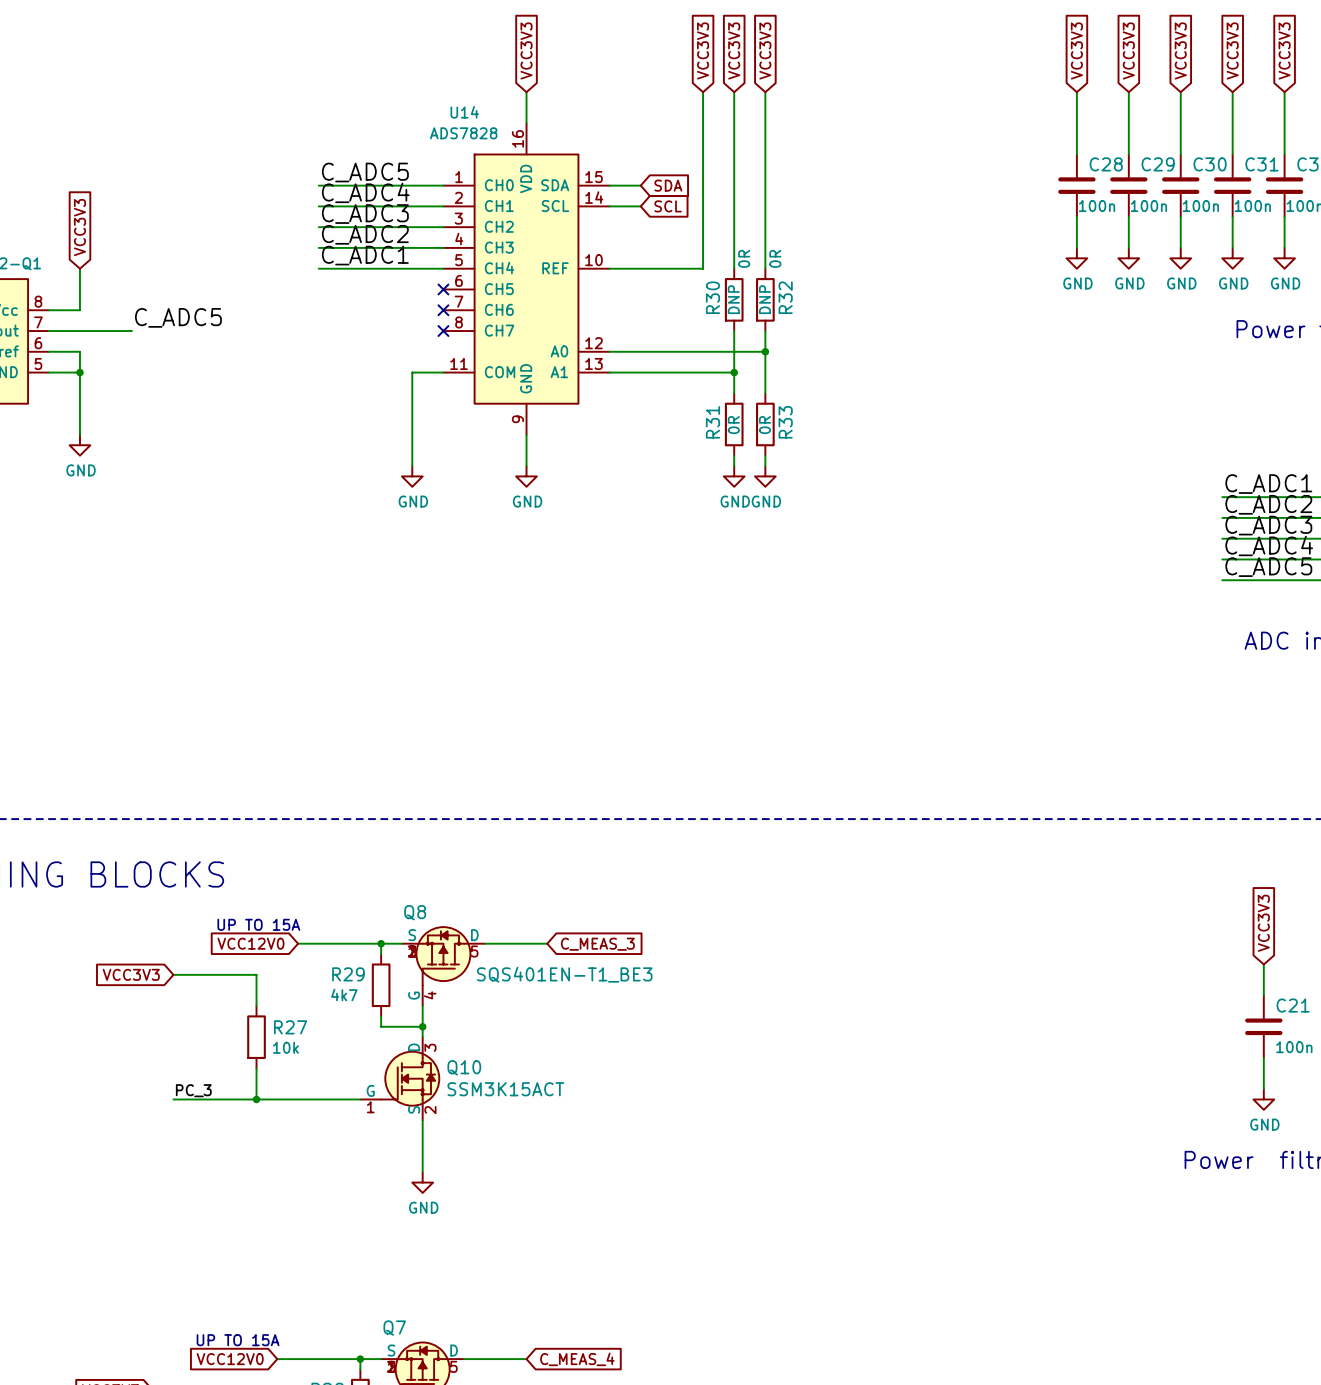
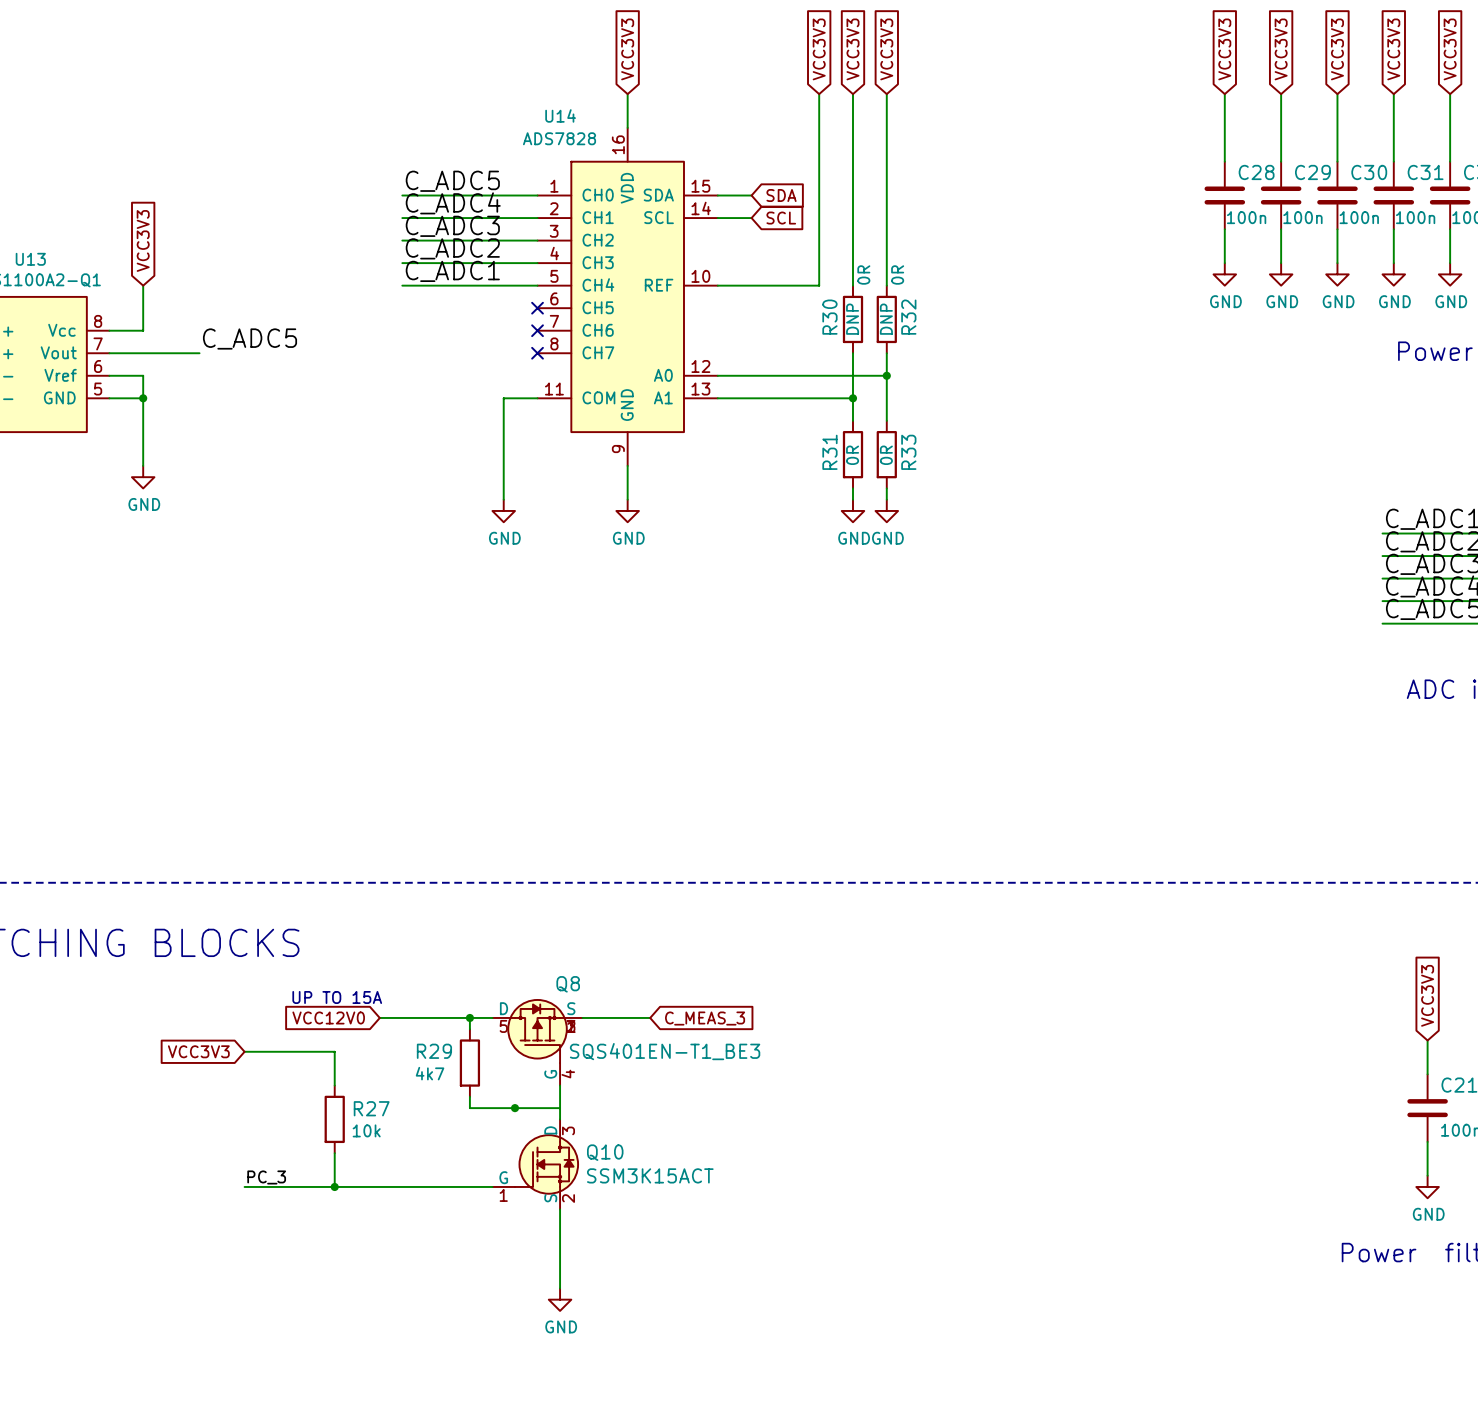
Q8 flip: as is (443, 956) -> left-right (537, 1031)
Q8 value position: SQS401EN-T1_BE3 (564, 974) -> SQS401EN-T1_BE3 (665, 1051)
wire: (422, 1006) (422, 1037) -> (560, 1085) (560, 1119)
wire: none -> (514, 1108) (560, 1108)
Q10 position: (399, 1078) -> (535, 1164)
wire: (422, 1120) (422, 1172) -> none
wire: none -> (560, 1209) (560, 1288)
power symbol position: GND (422, 1182) -> GND (560, 1299)

